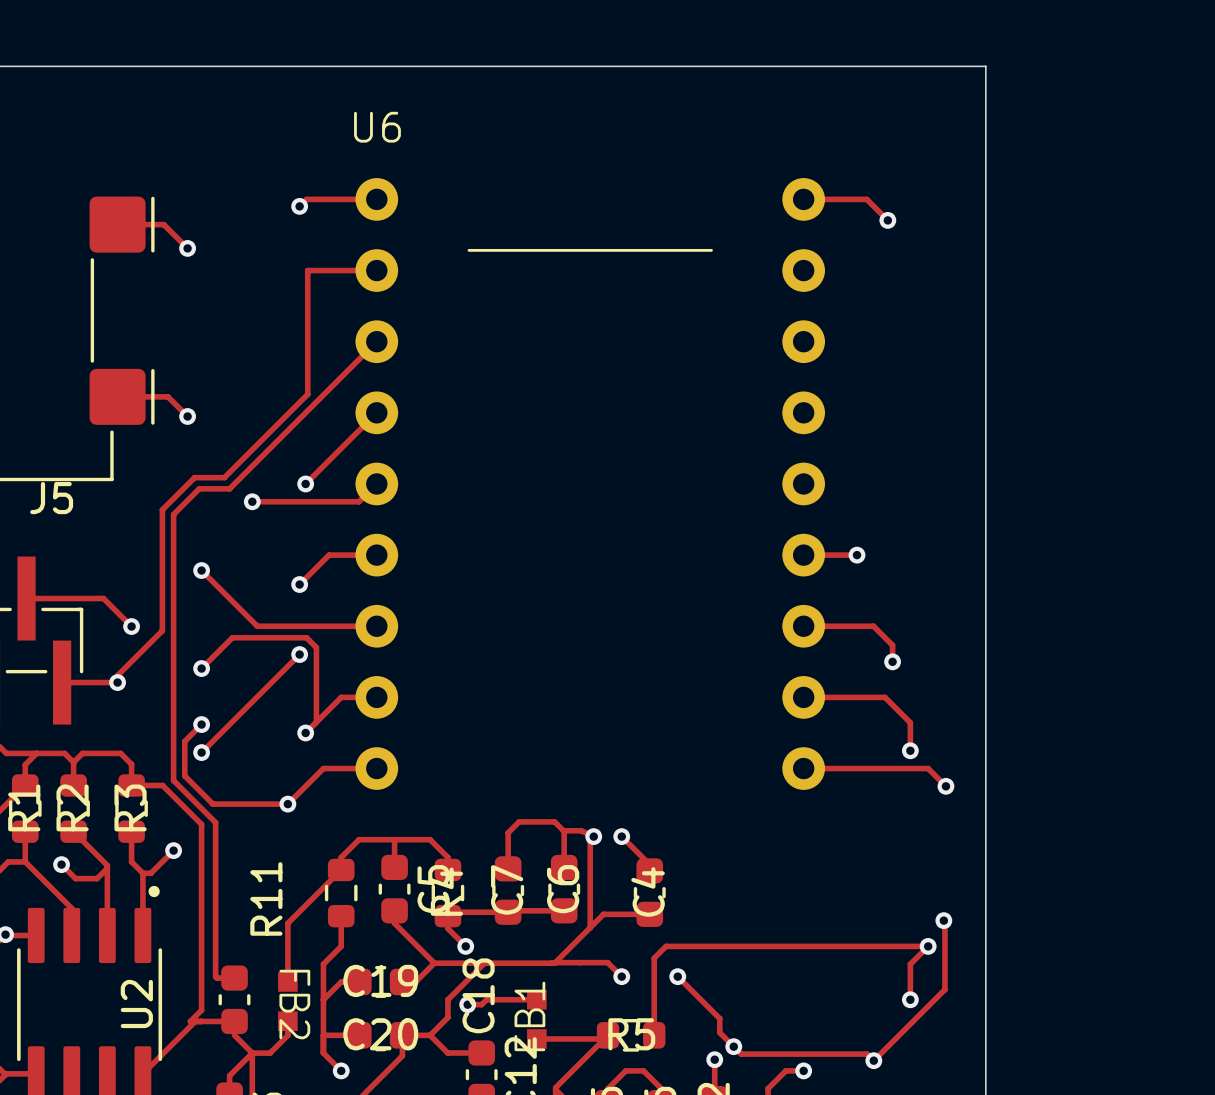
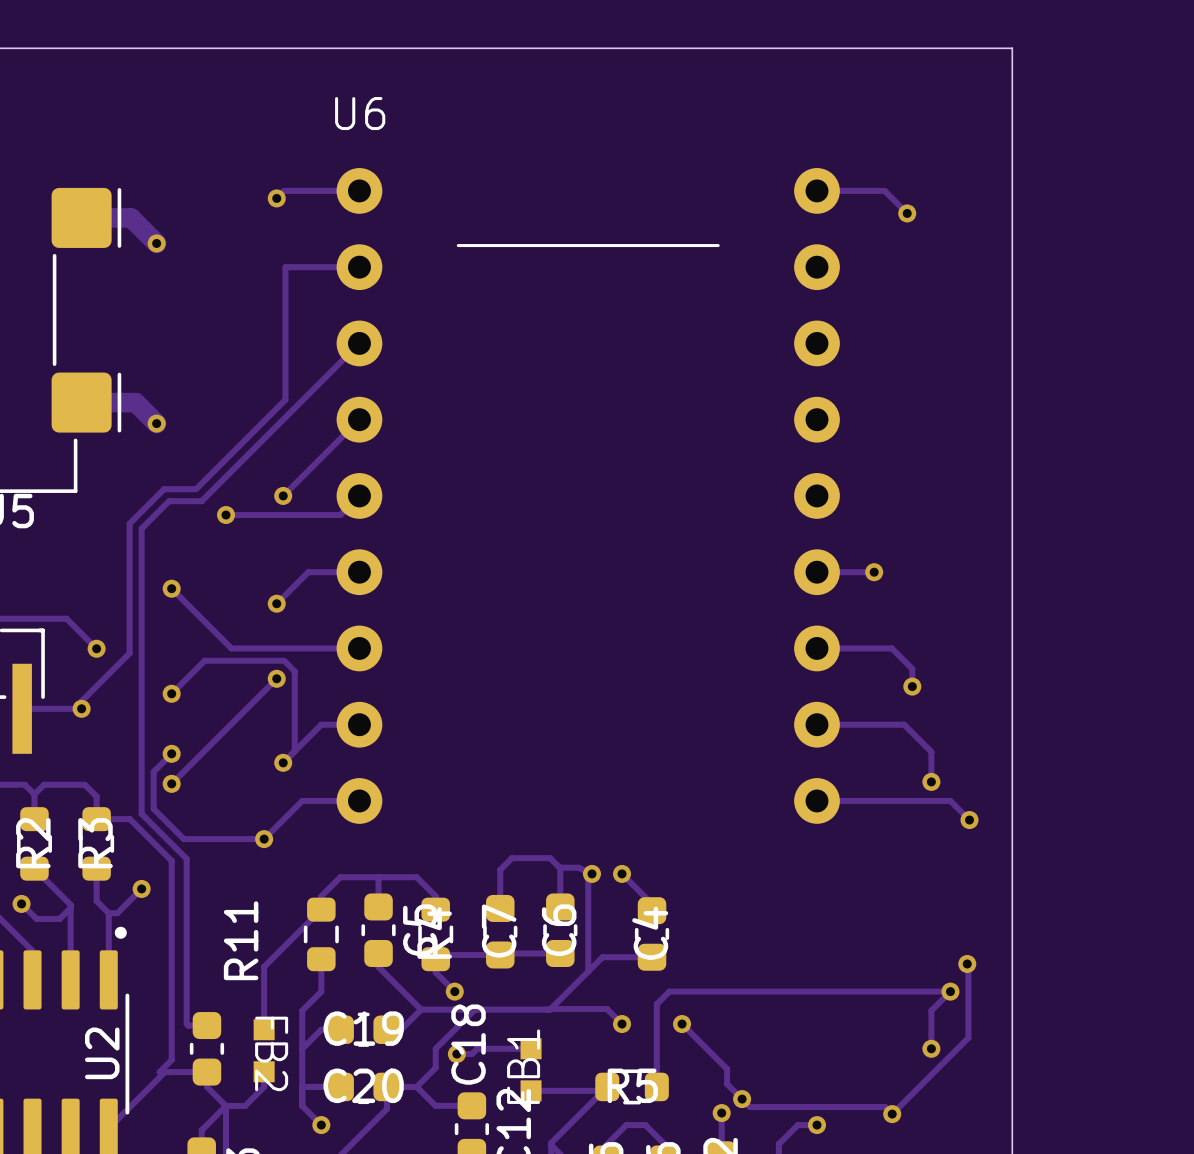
track width: thin (117, 224) (163, 224) (187, 248) -> thick (81, 217) (131, 217) (156, 243)
track width: thin (117, 396) (167, 396) (187, 416) -> thick (81, 402) (135, 402) (156, 423)

